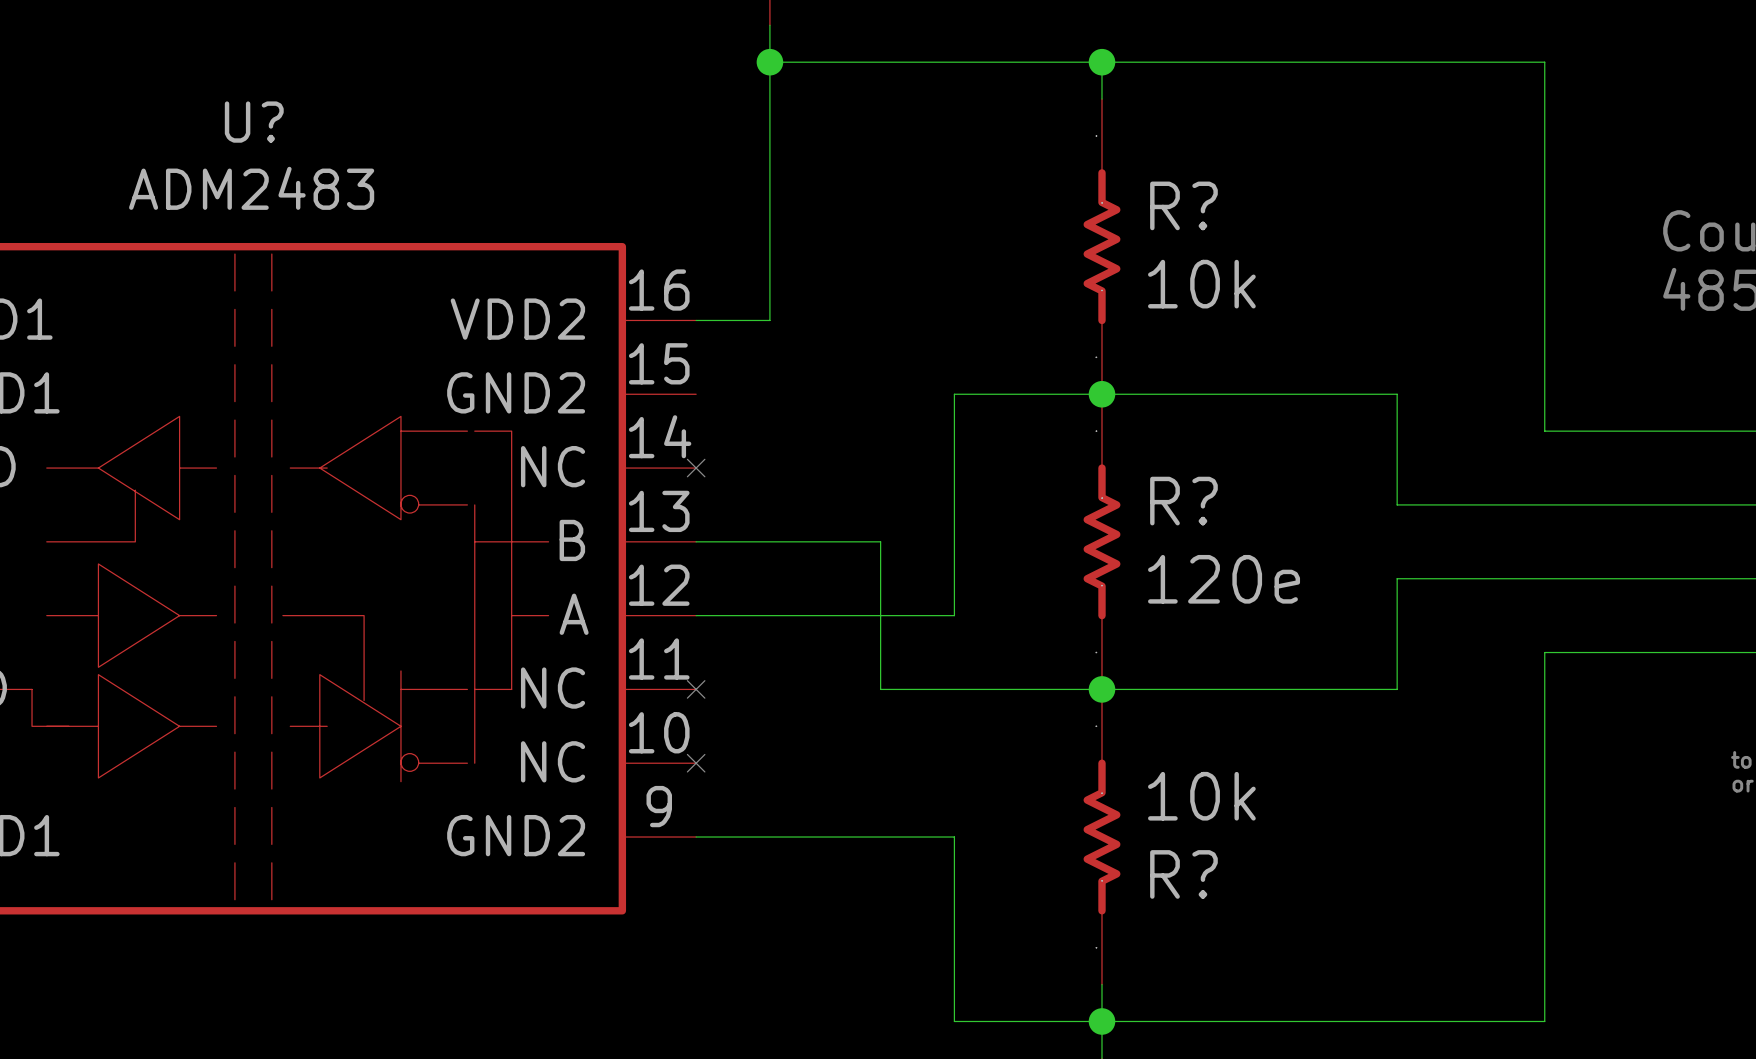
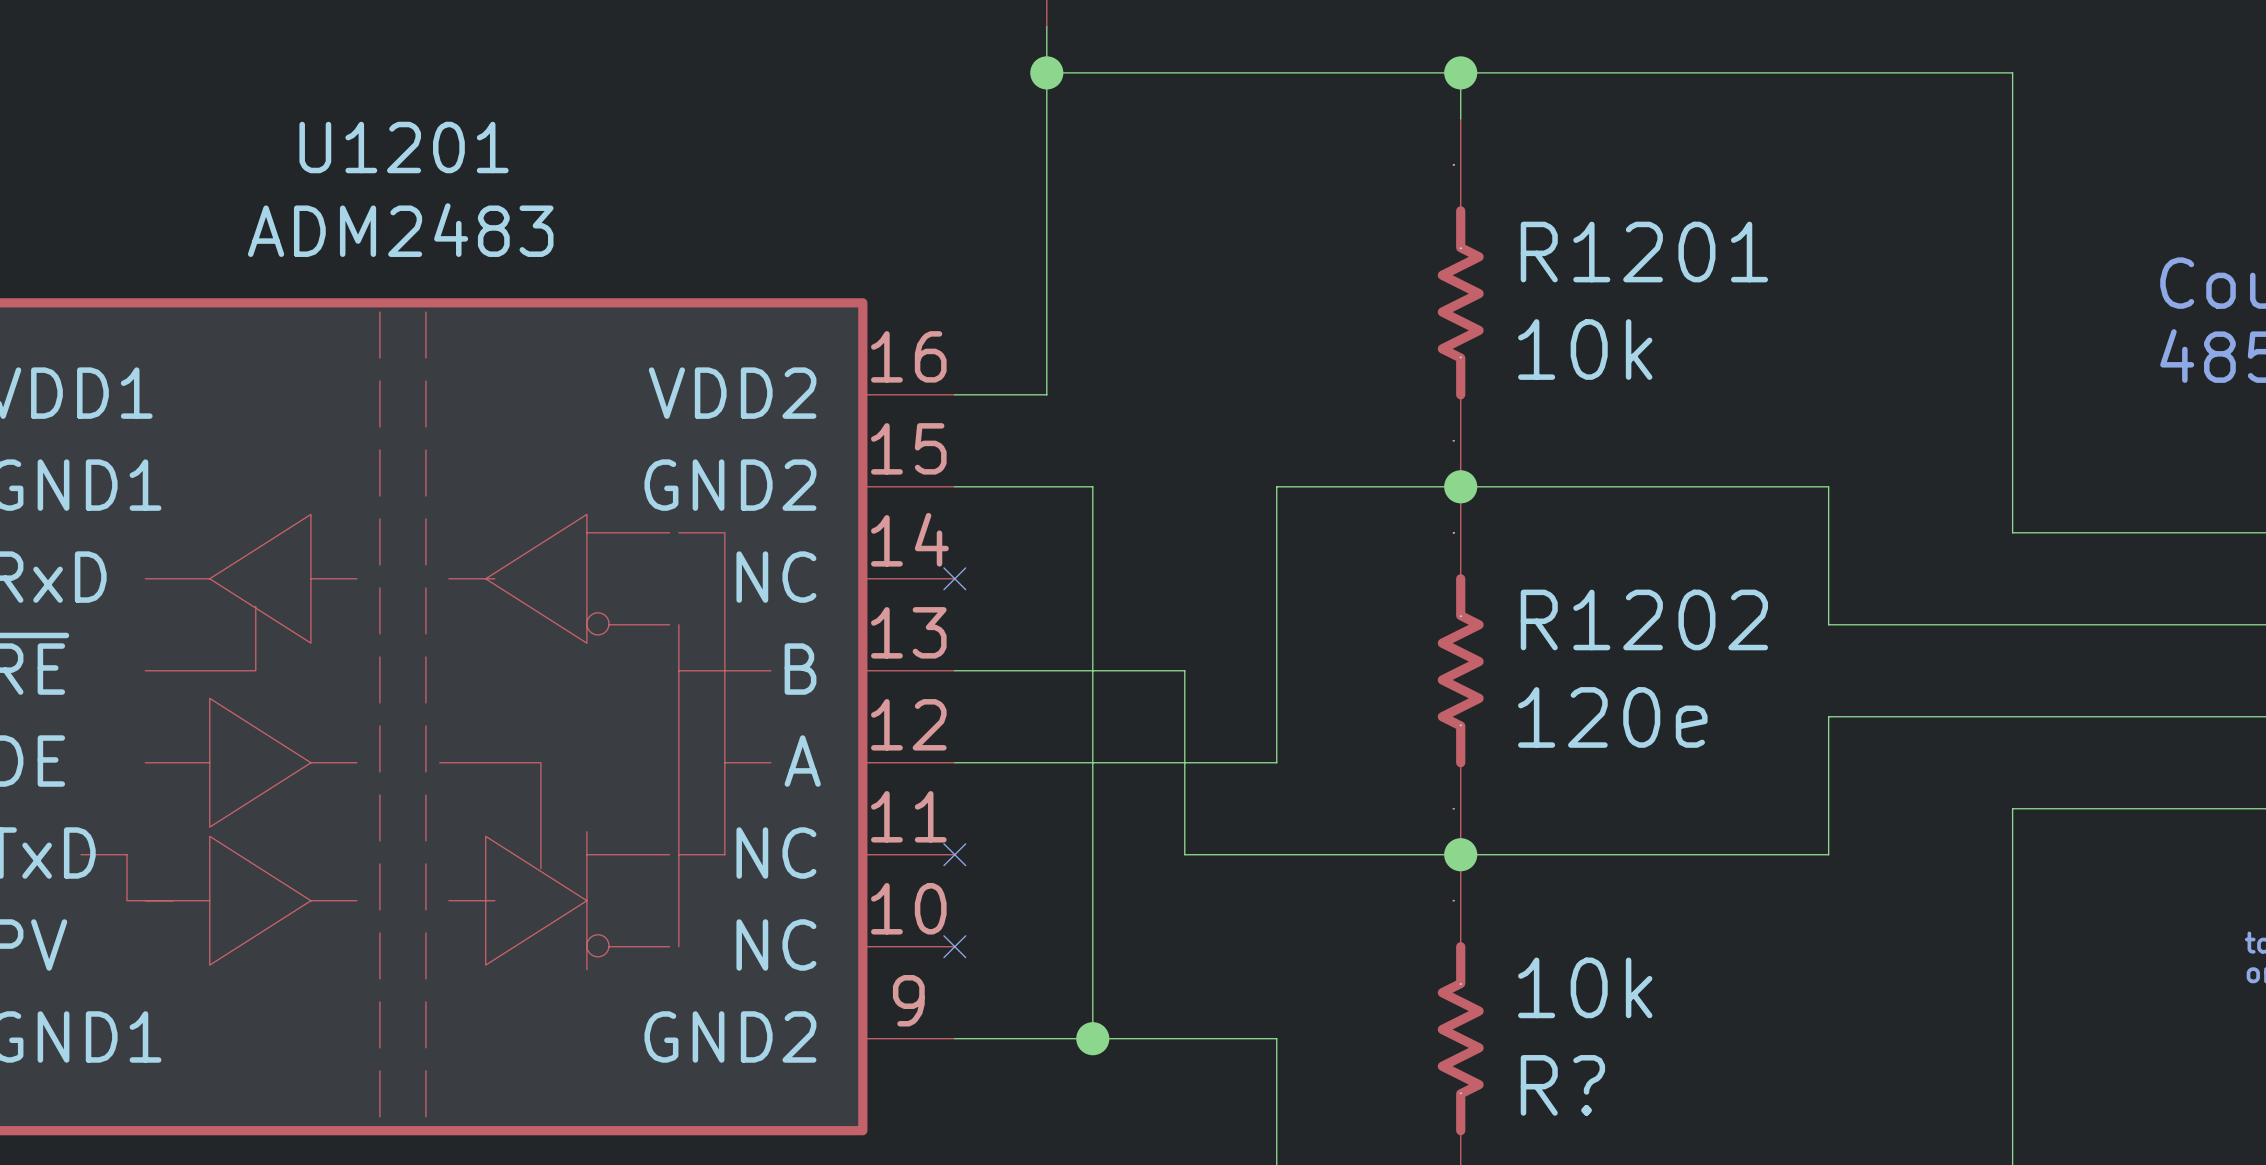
U? name: U? (254, 122) -> U1201 (404, 147)
R? name: R? (1183, 205) -> R1201 (1644, 252)
wire: none -> (954, 486) (1092, 486) (1092, 1038)
R? name: R? (1183, 501) -> R1202 (1644, 619)
junction: none -> (1092, 1038)

